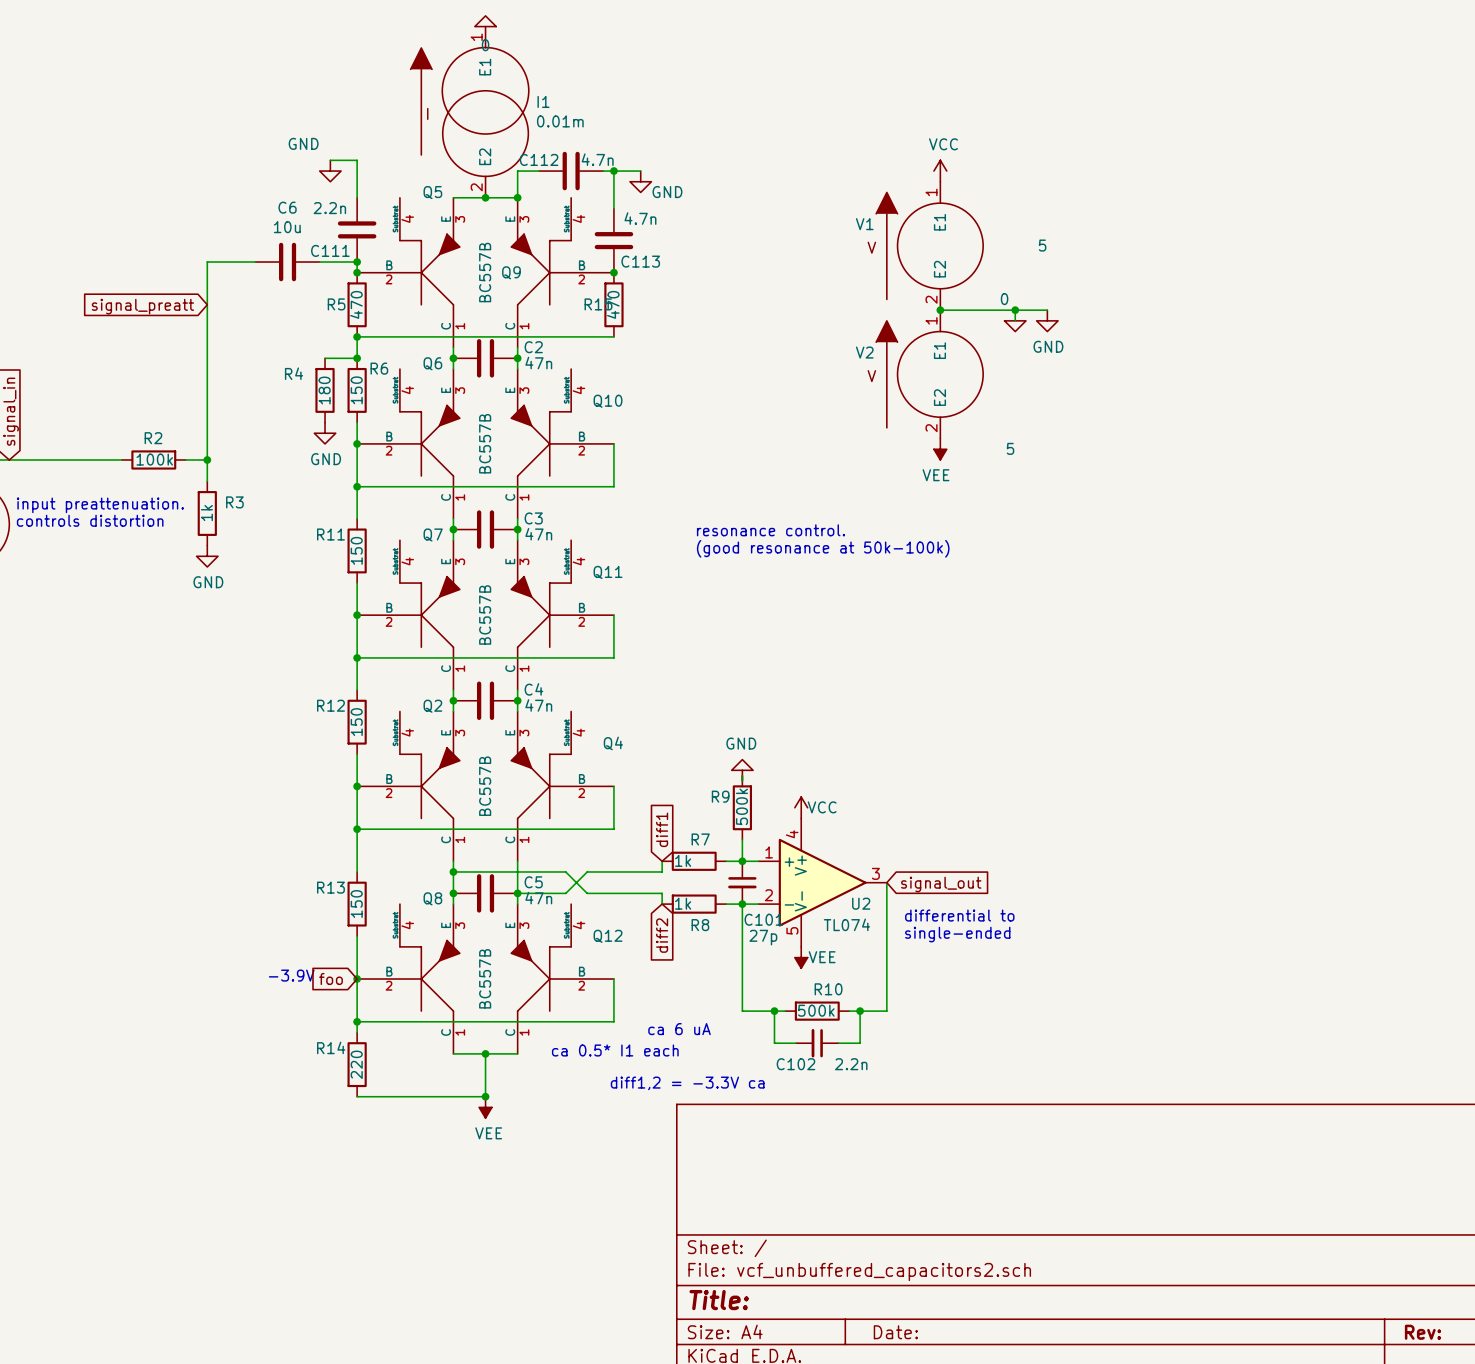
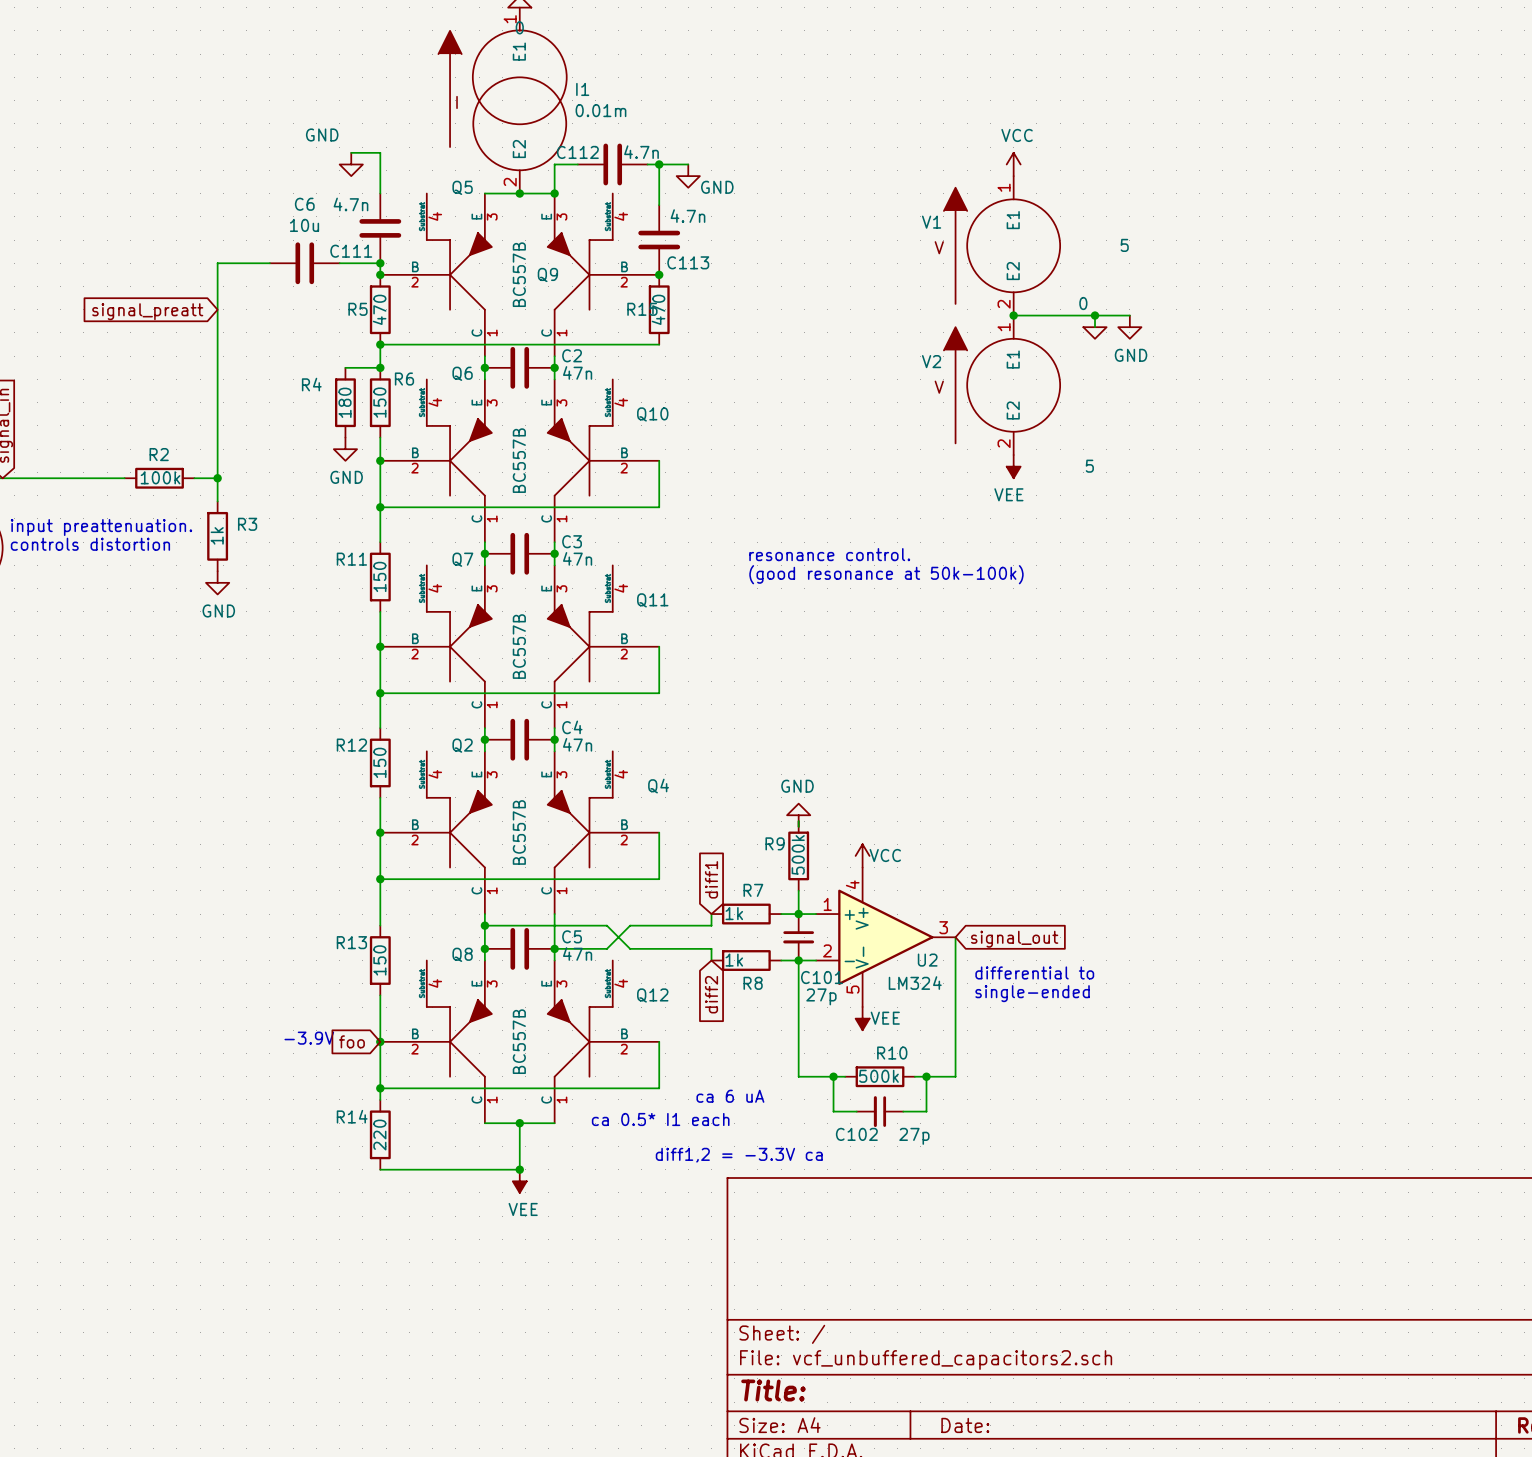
C111 value: 2.2n (329, 208) -> 4.7n (350, 204)
U2 value: TL074 (846, 924) -> LM324 (915, 983)
C102 value: 2.2n (851, 1064) -> 27p (914, 1136)

